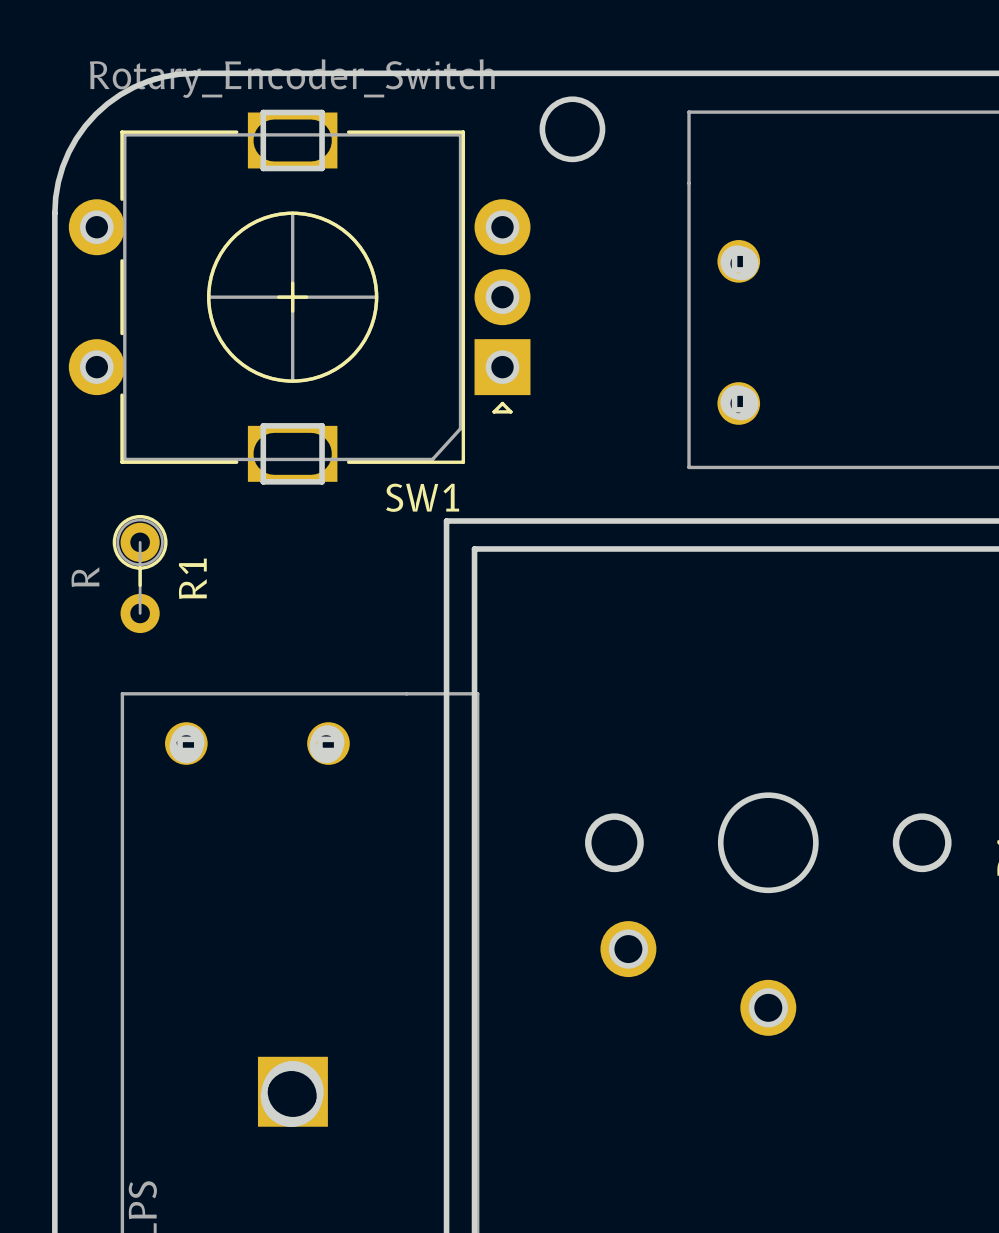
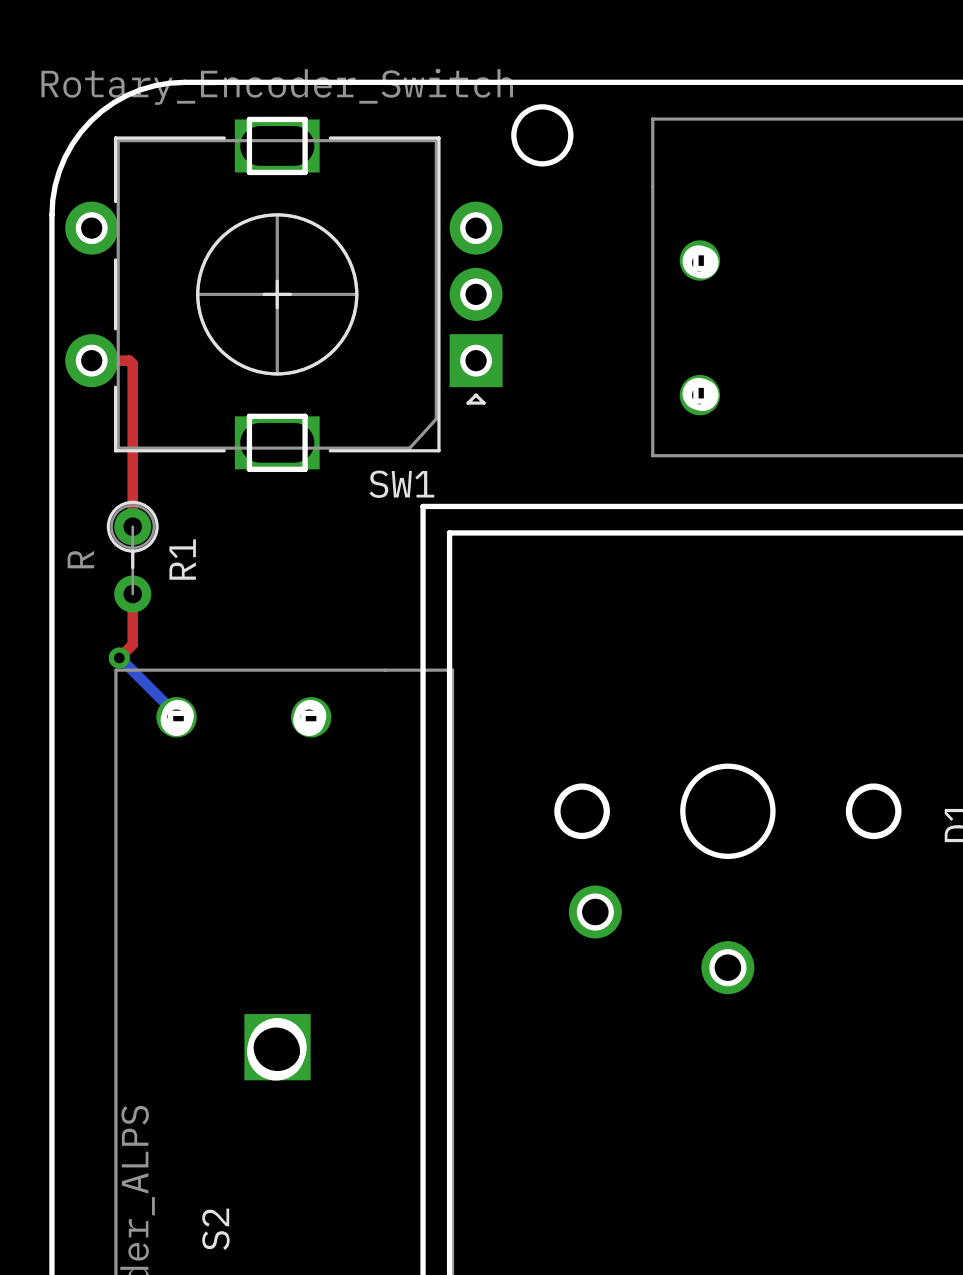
top track: none -> (91, 360) (129, 360) (132, 364) (132, 526)
top track: none -> (132, 594) (132, 644) (119, 657)
bottom track: none -> (119, 657) (177, 715)
via: none -> (119, 657)

